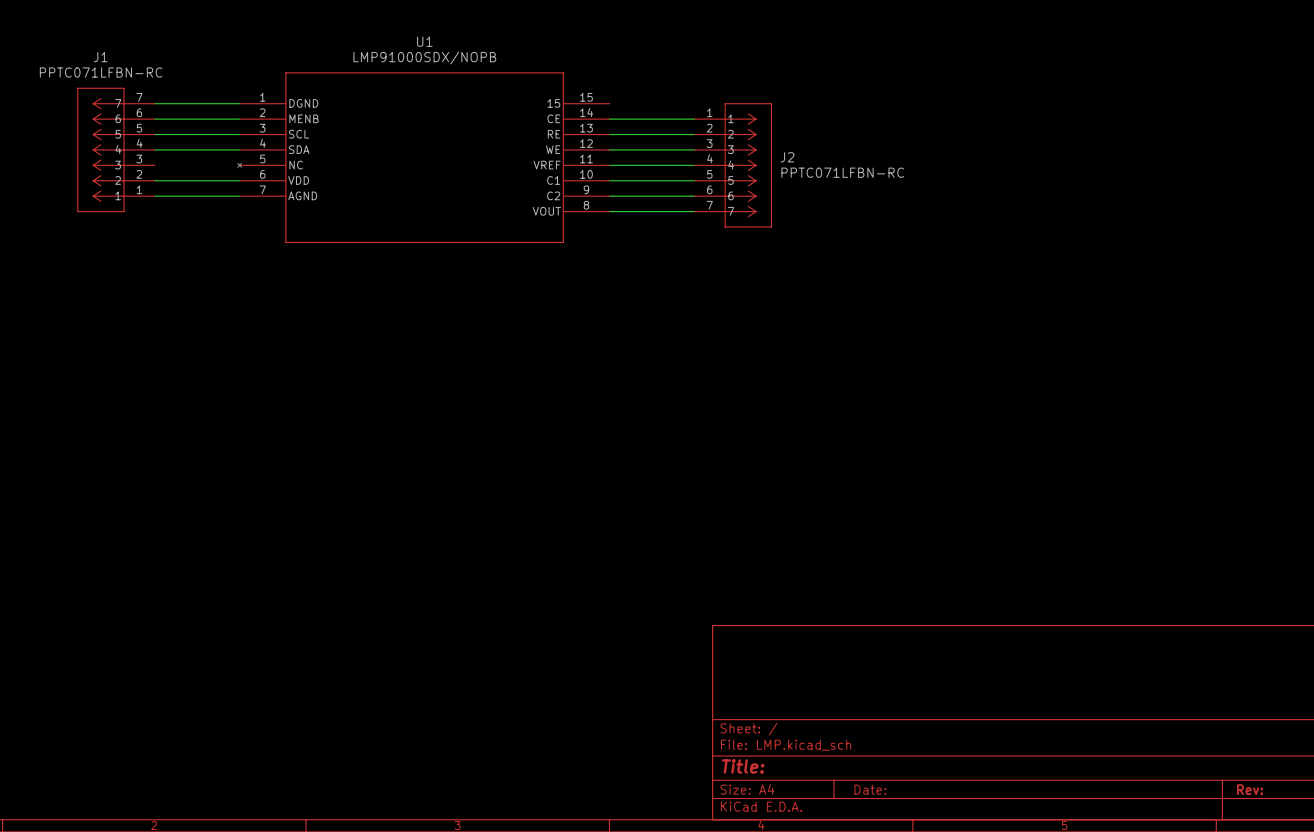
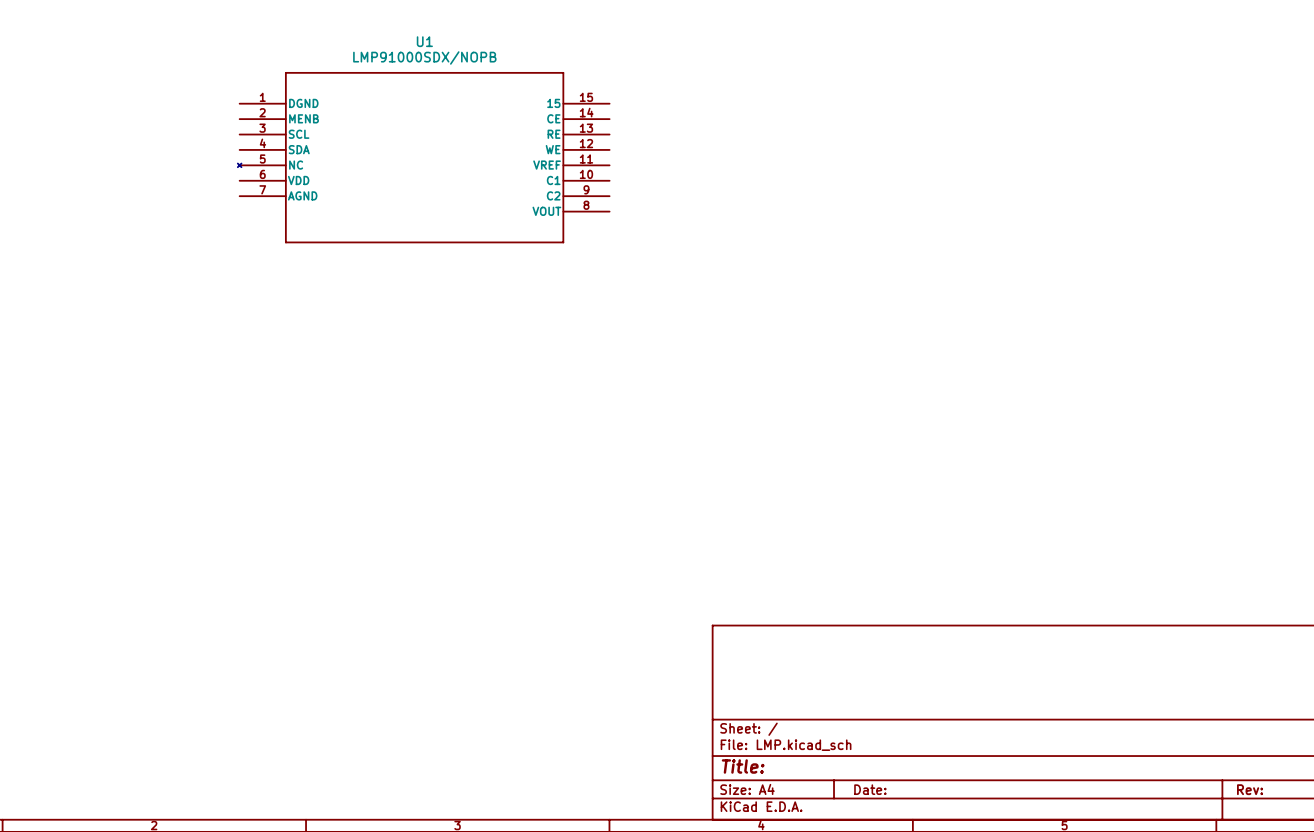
wire: (154, 103) (239, 103) -> none
wire: (154, 119) (239, 119) -> none
wire: (609, 119) (694, 119) -> none
wire: (154, 134) (239, 134) -> none
wire: (609, 134) (694, 134) -> none
J1: PPTC071LFBN-RC (116, 149) -> none
wire: (154, 149) (239, 149) -> none
wire: (609, 149) (694, 149) -> none
wire: (609, 165) (694, 165) -> none
J2: PPTC071LFBN-RC (733, 165) -> none
wire: (154, 180) (239, 180) -> none
wire: (609, 180) (694, 180) -> none
wire: (154, 196) (239, 196) -> none
wire: (609, 196) (694, 196) -> none
wire: (609, 211) (694, 211) -> none

